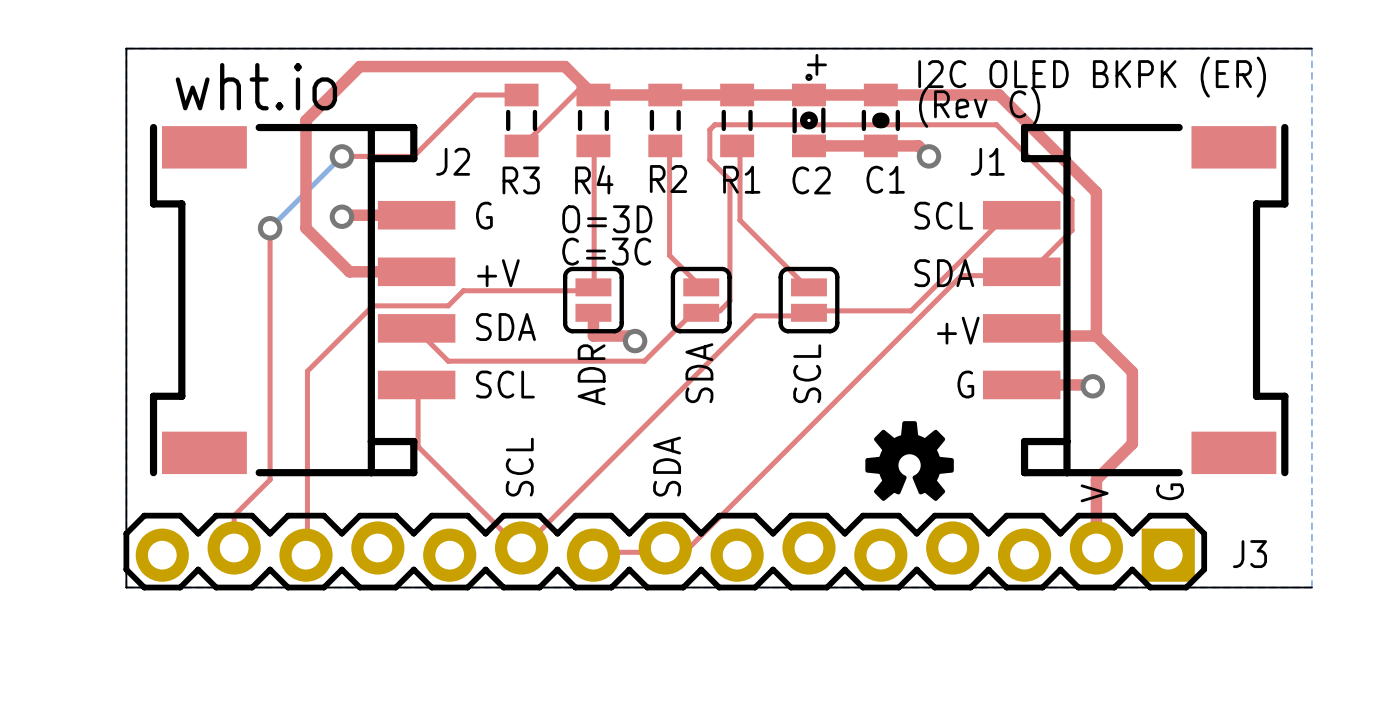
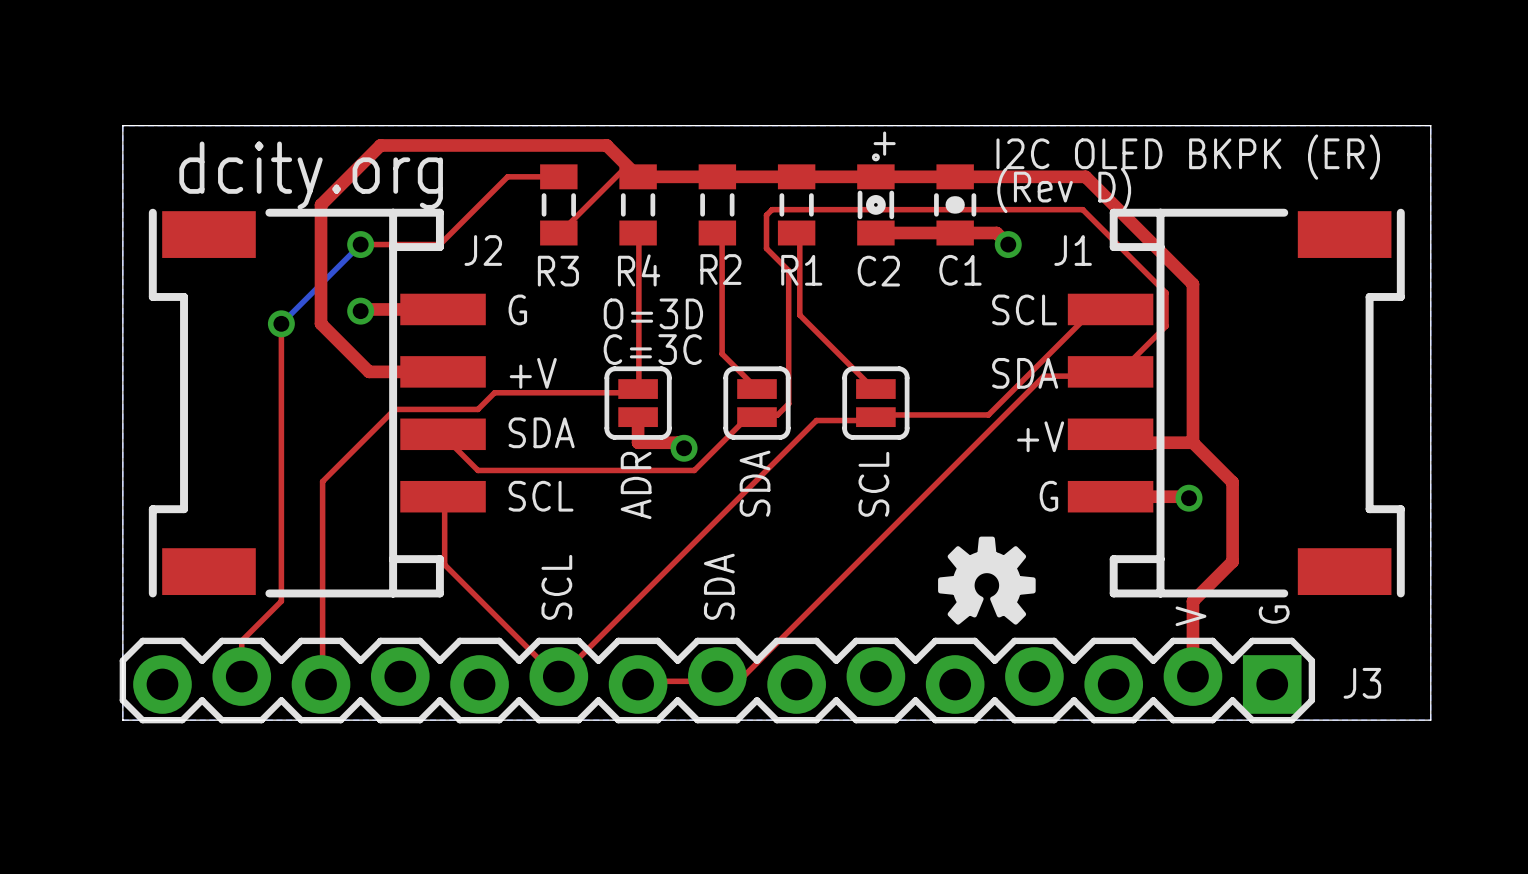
board edge: none -> (1430, 125) (1430, 720)
text: wht.io (256, 86) -> dcity.org (311, 175)
text: (Rev C) (979, 107) -> (Rev D) (1064, 190)

